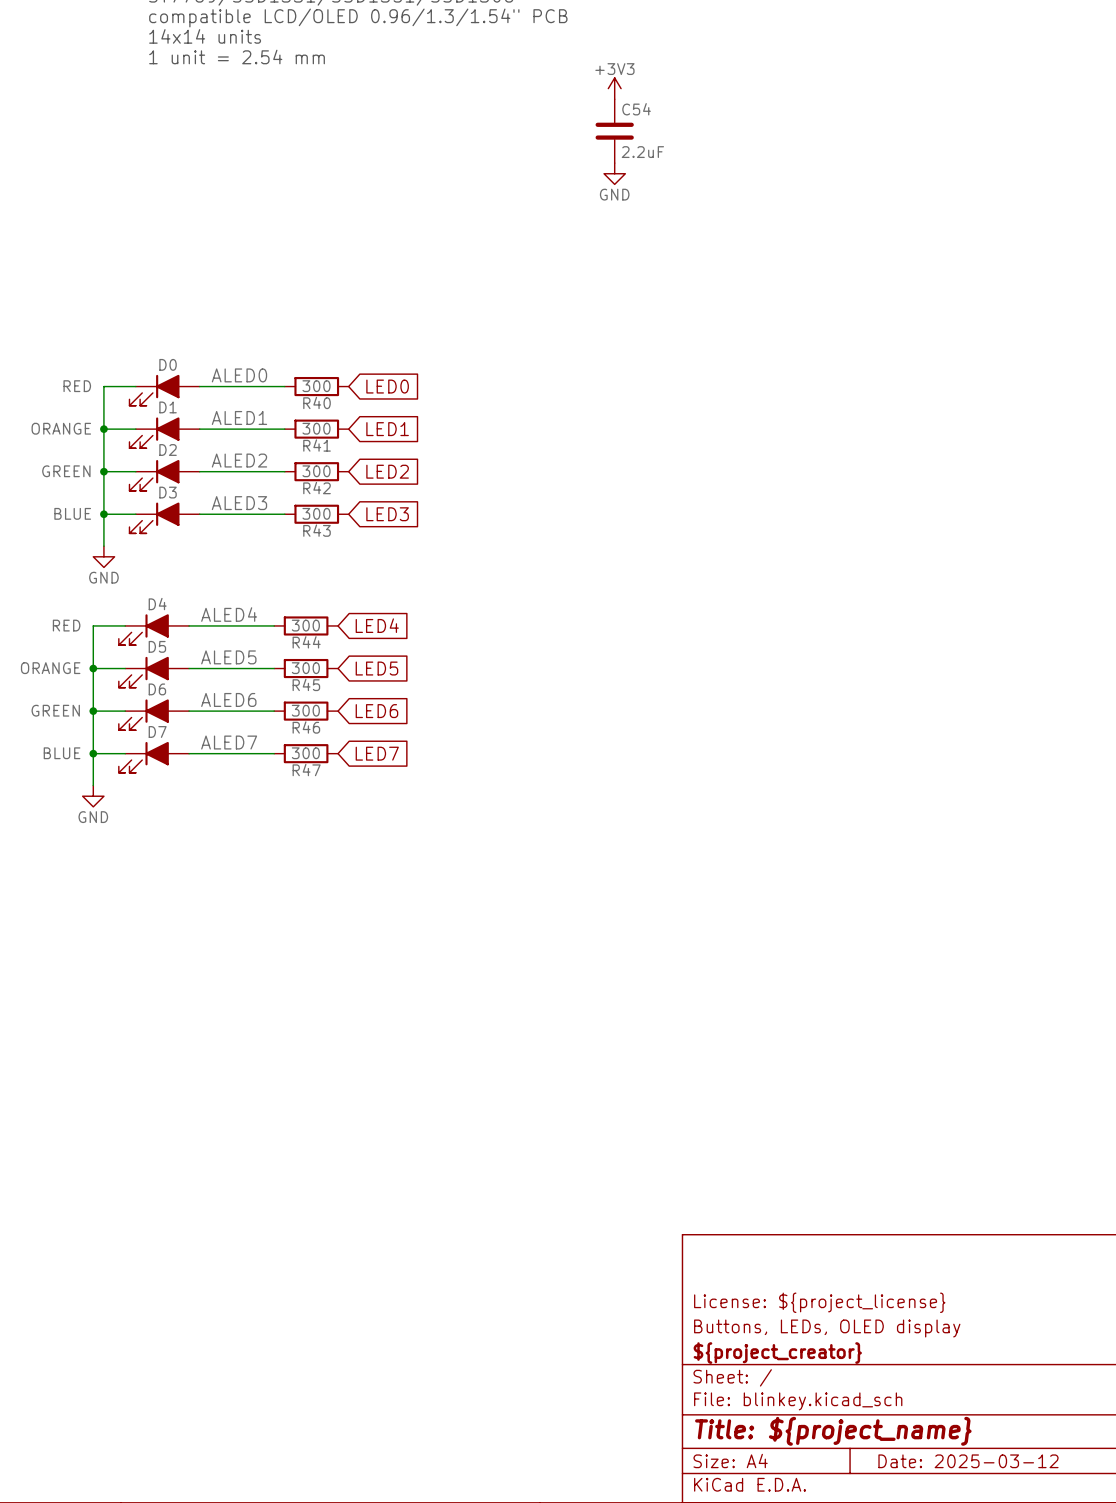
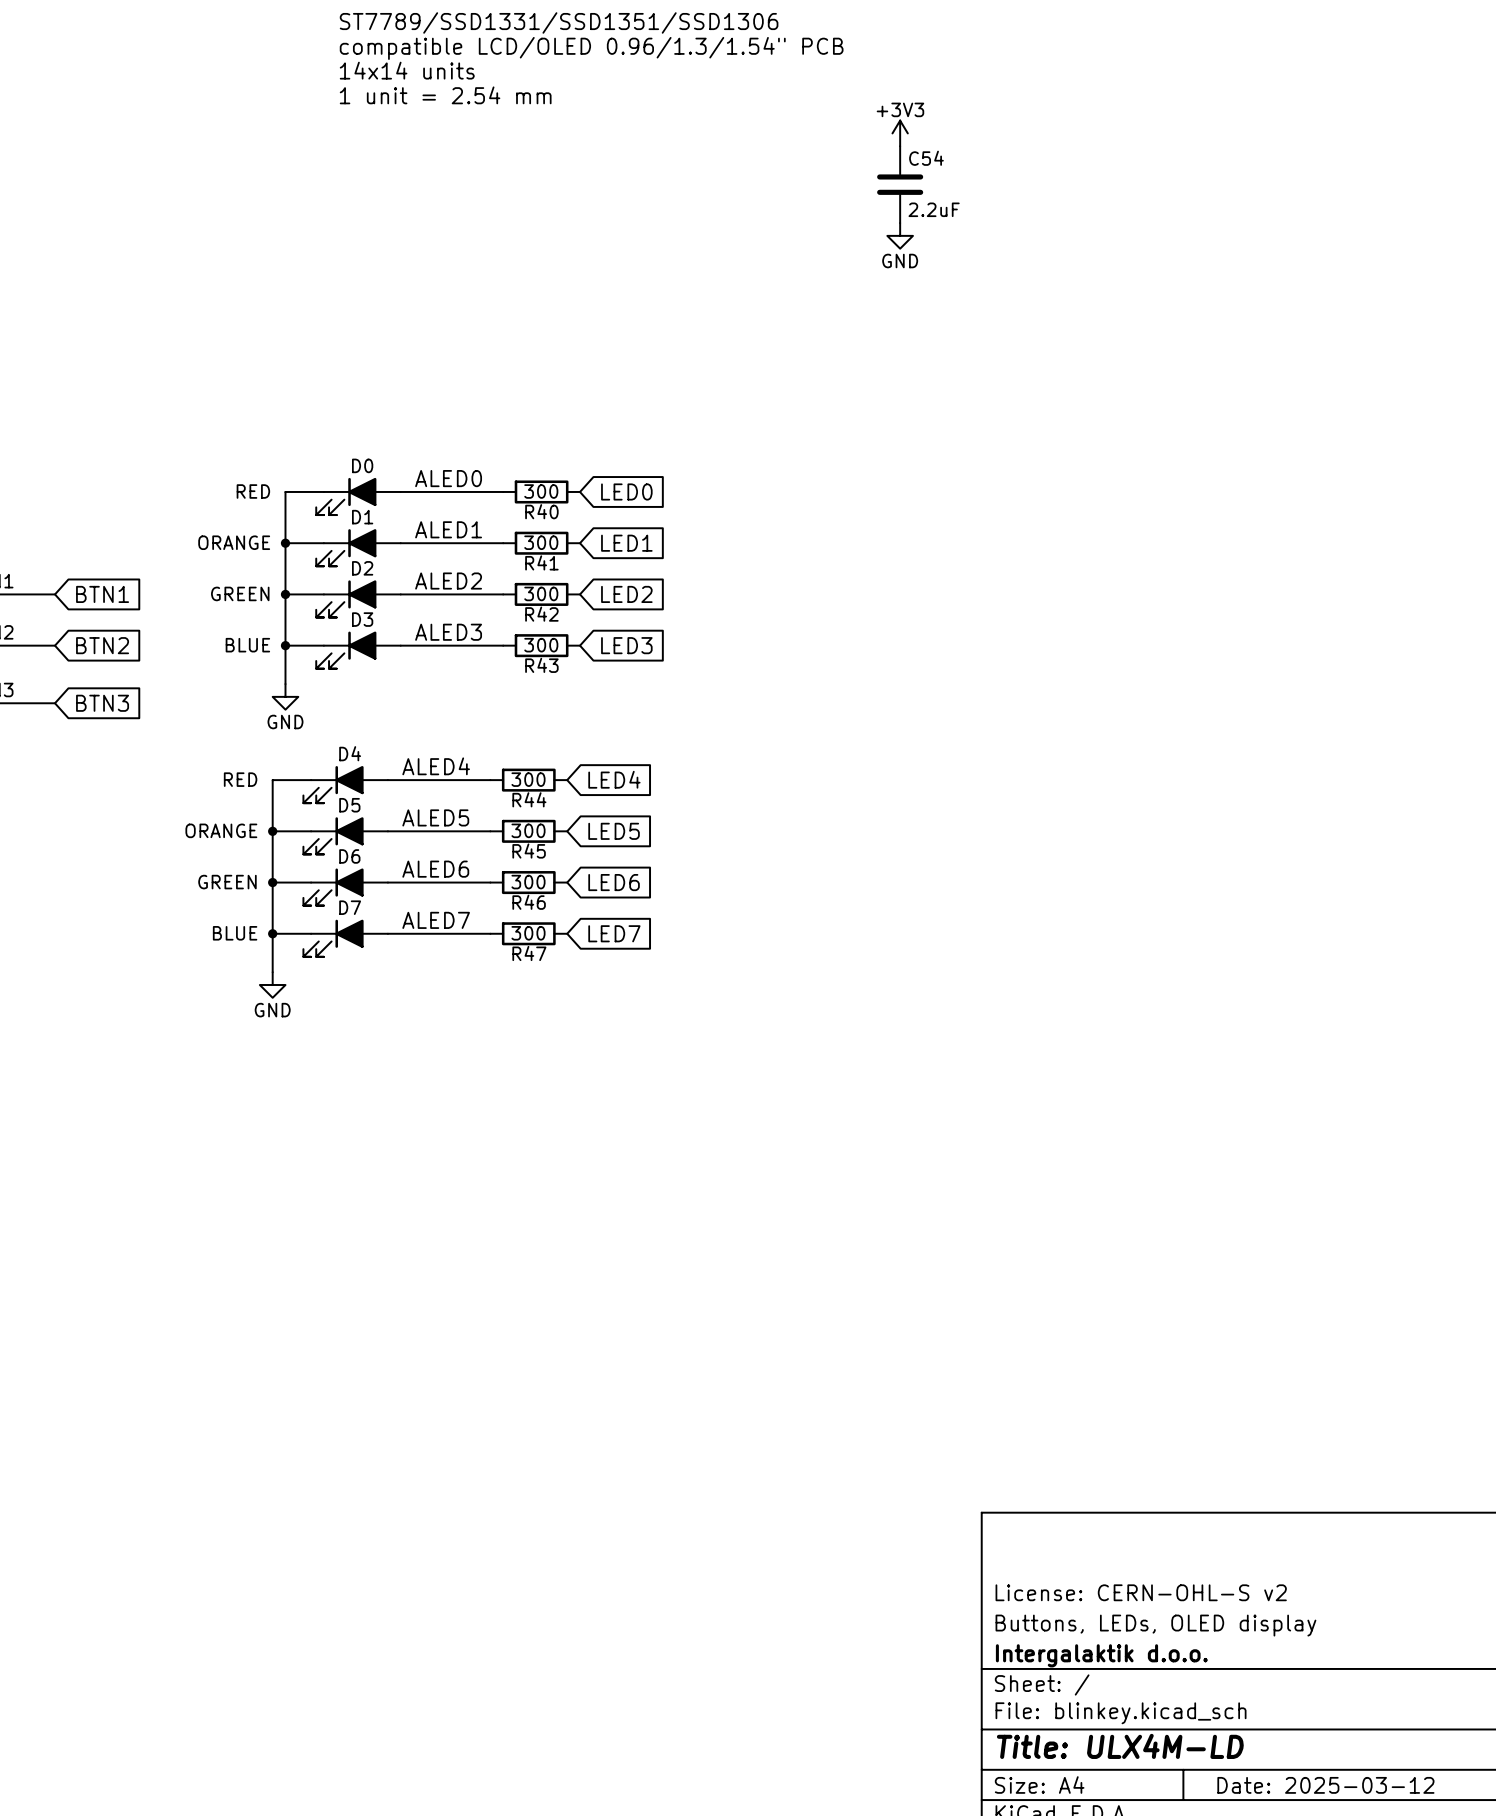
title block: License: ${project_license} (819, 1302) -> License: CERN-OHL-S v2 (1141, 1592)
title block: ${project_creator} (777, 1353) -> Intergalaktik d.o.o. (1101, 1655)
title block: Title: ${project_name} (833, 1431) -> Title: ULX4M-LD (1120, 1746)

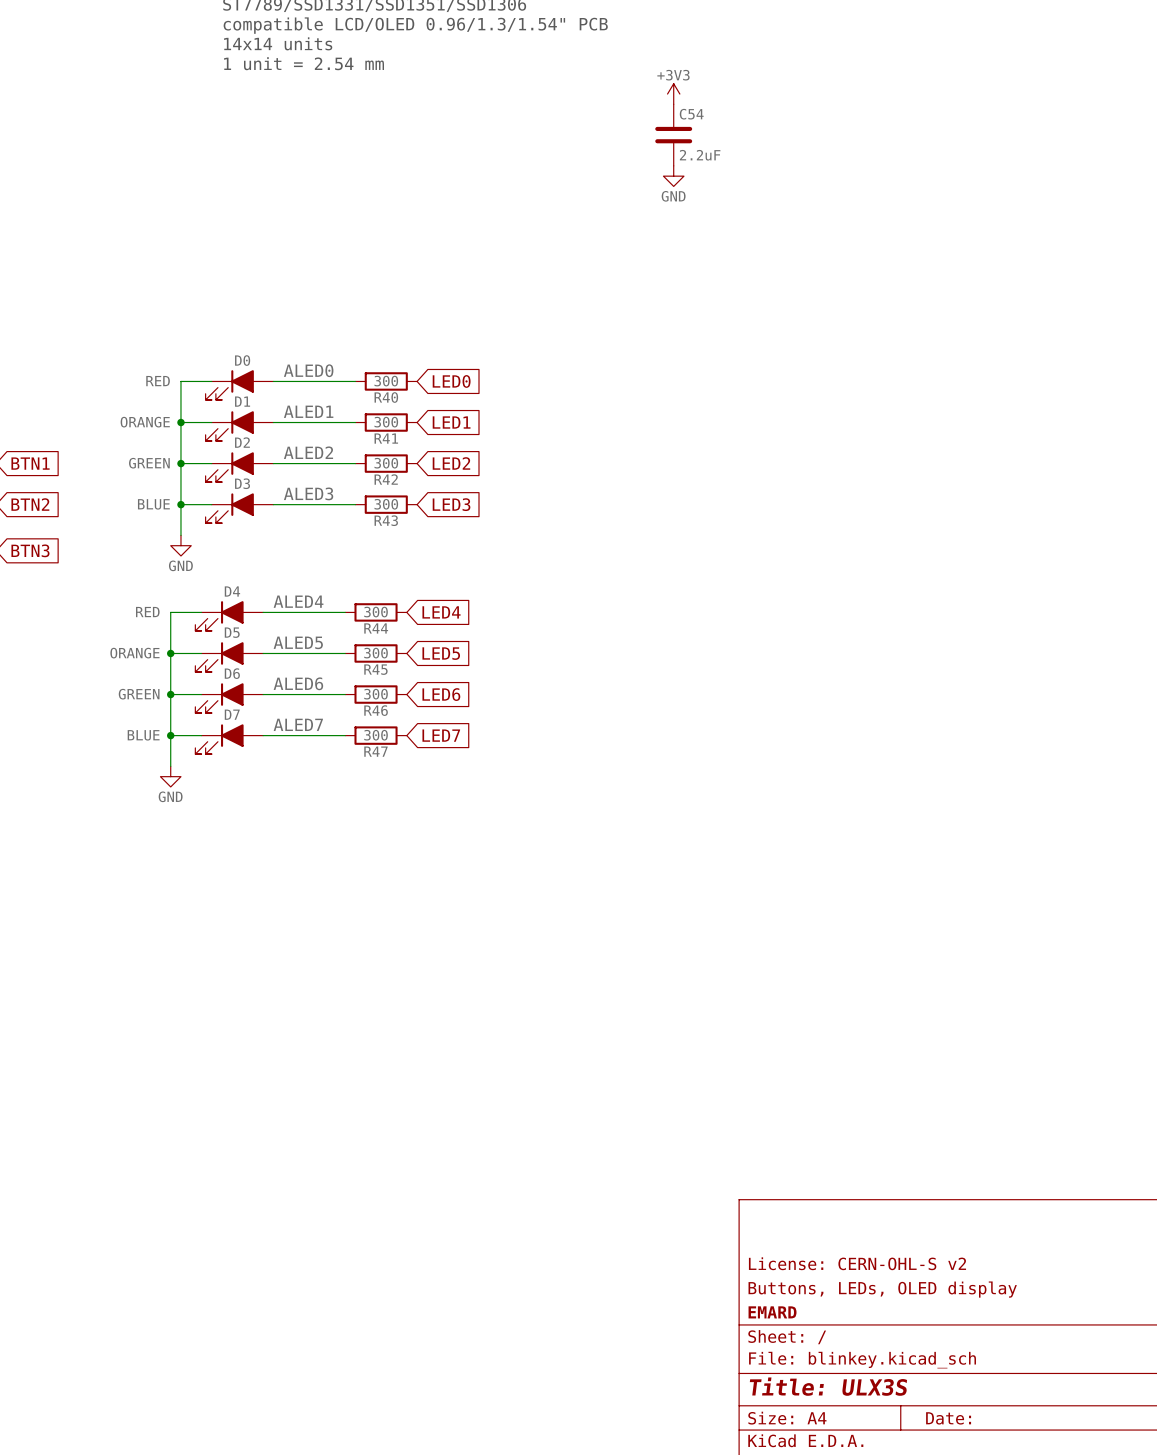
title block: Intergalaktik d.o.o. (1101, 1655) -> EMARD (772, 1312)
title block: Title: ULX4M-LD (1120, 1746) -> Title: ULX3S (828, 1386)
title block: Date: 2025-03-12 (1325, 1785) -> Date: (948, 1418)

